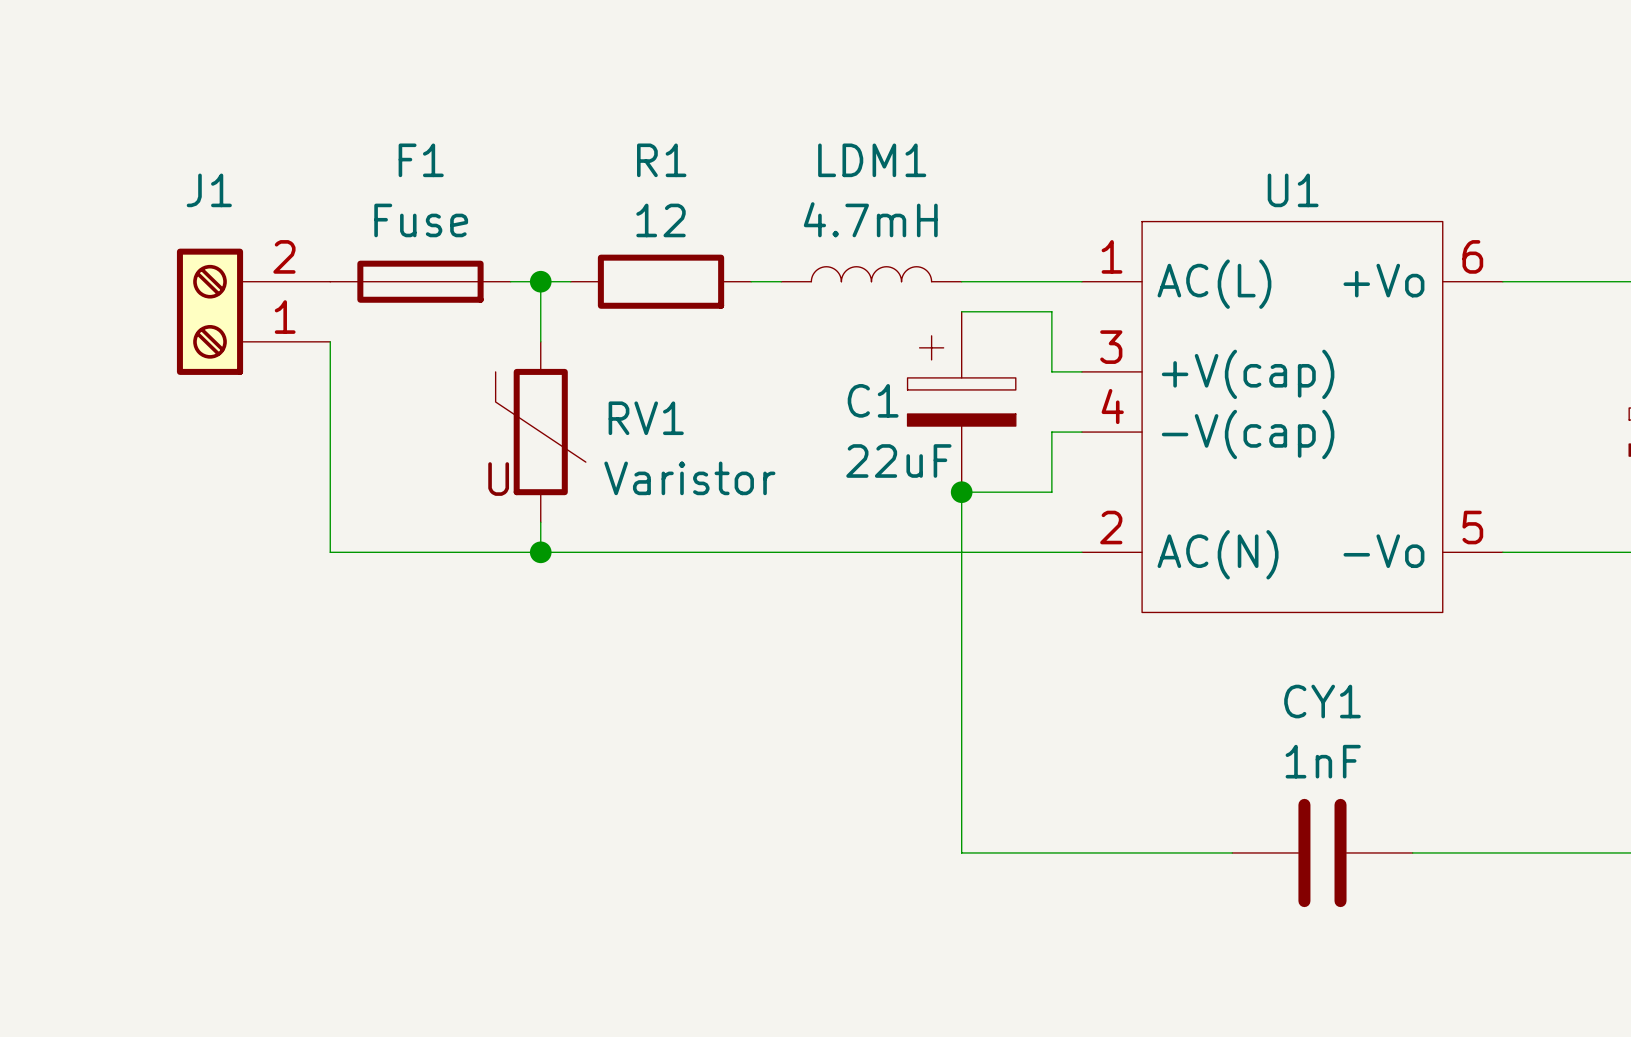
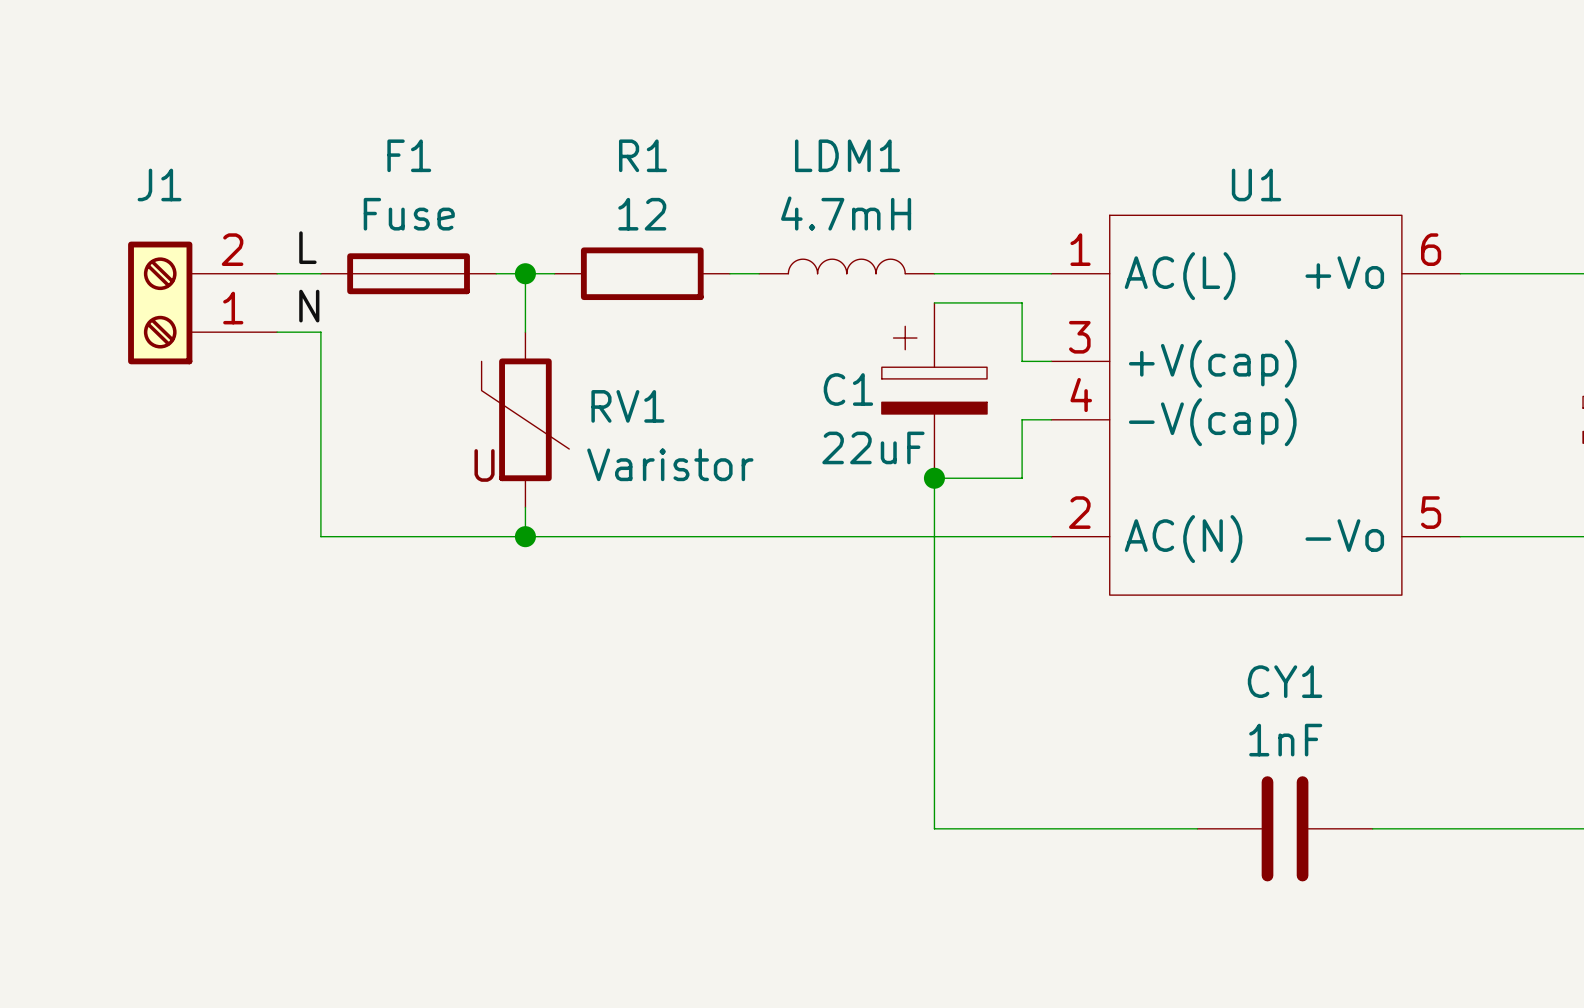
label: none -> L (307, 247)
J1 position: (253, 311) -> (202, 302)
label: none -> N (309, 306)

